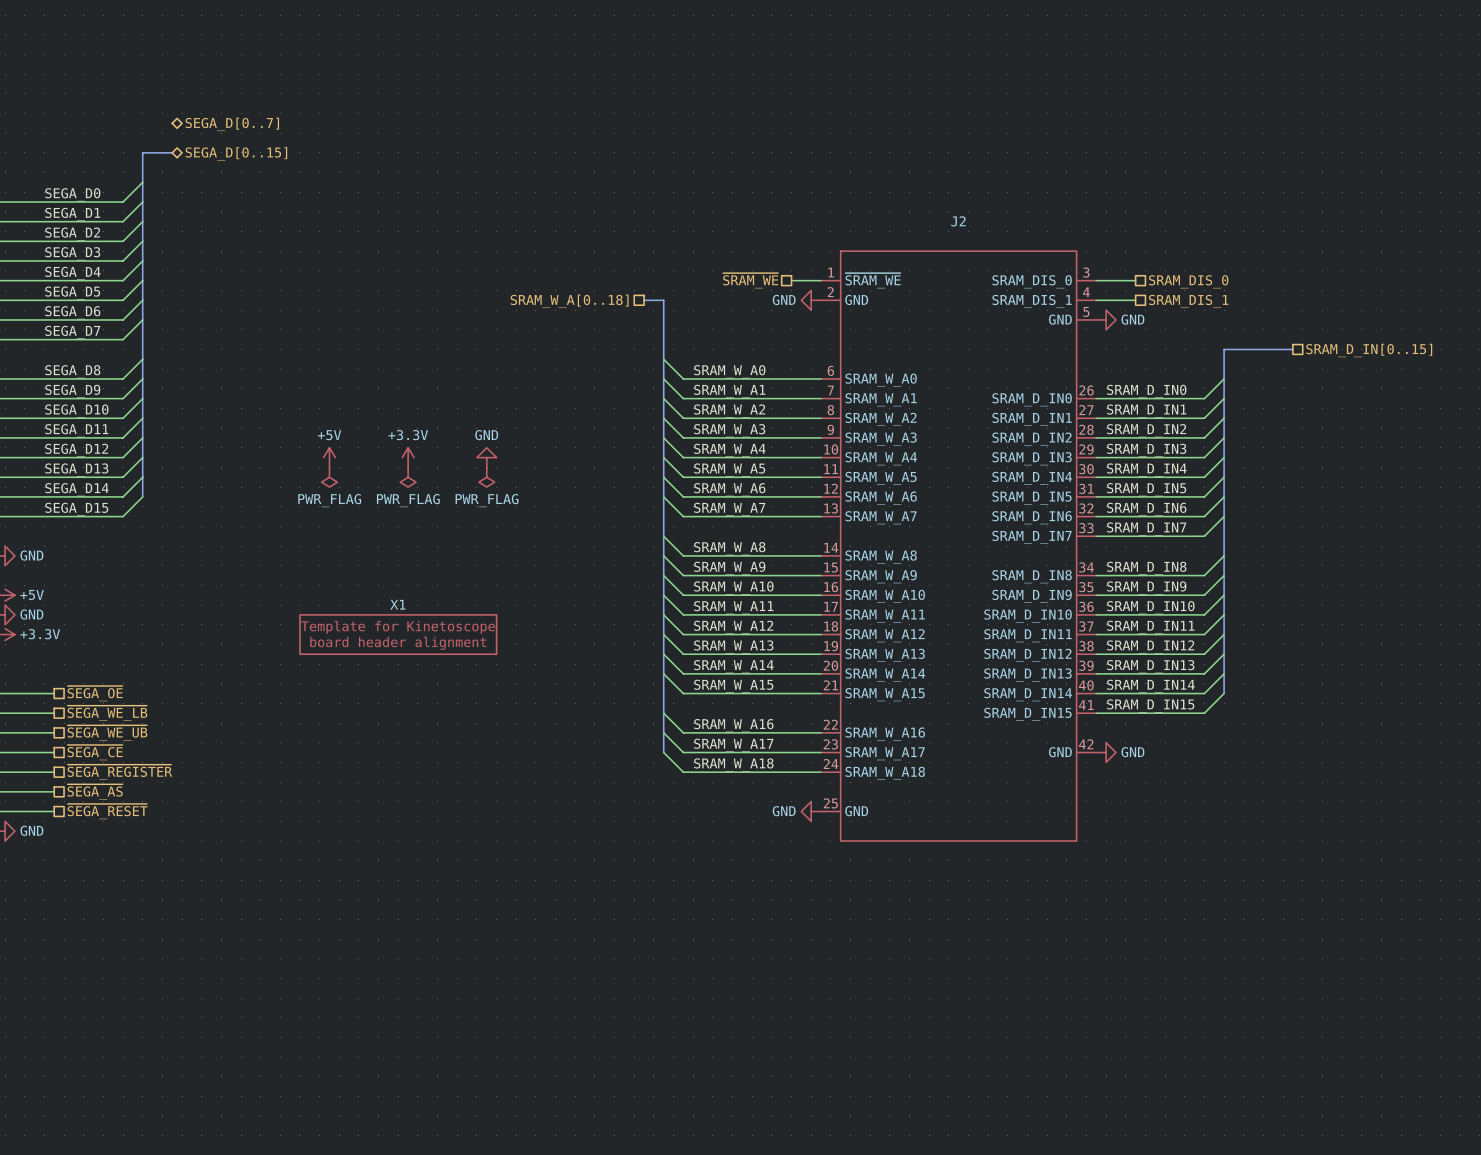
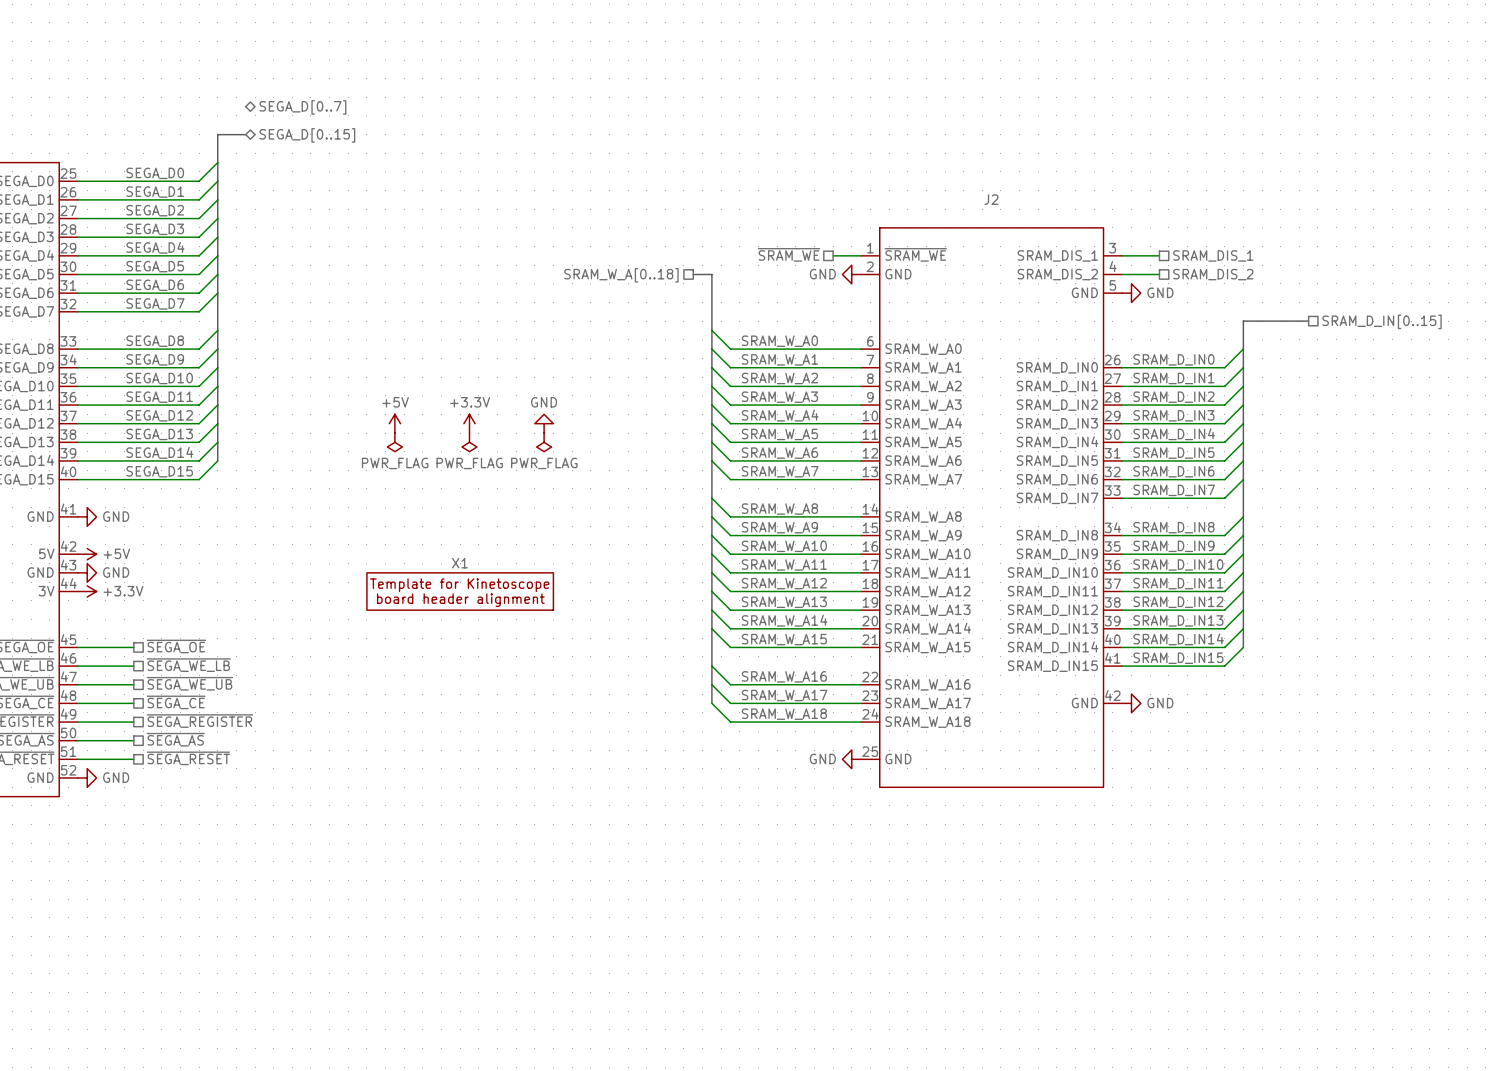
J2 pin name: SRAM_DIS_0 (1032, 281) -> SRAM_DIS_1 (1057, 255)
hierarchical label: SRAM_DIS_0 (1188, 281) -> SRAM_DIS_1 (1213, 255)
J2 pin name: SRAM_DIS_1 (1032, 301) -> SRAM_DIS_2 (1057, 274)
hierarchical label: SRAM_DIS_1 (1188, 301) -> SRAM_DIS_2 (1213, 274)

